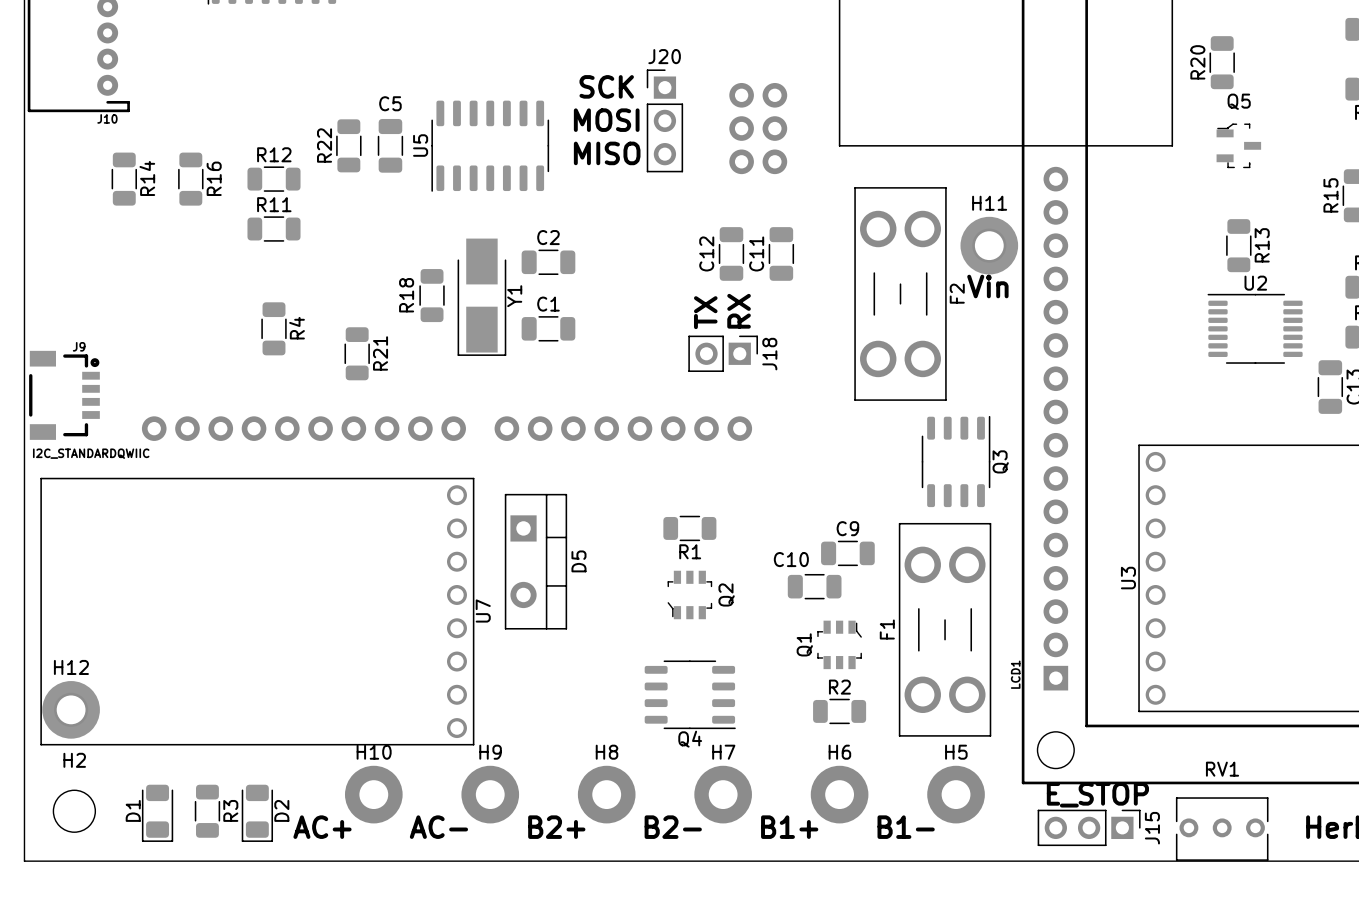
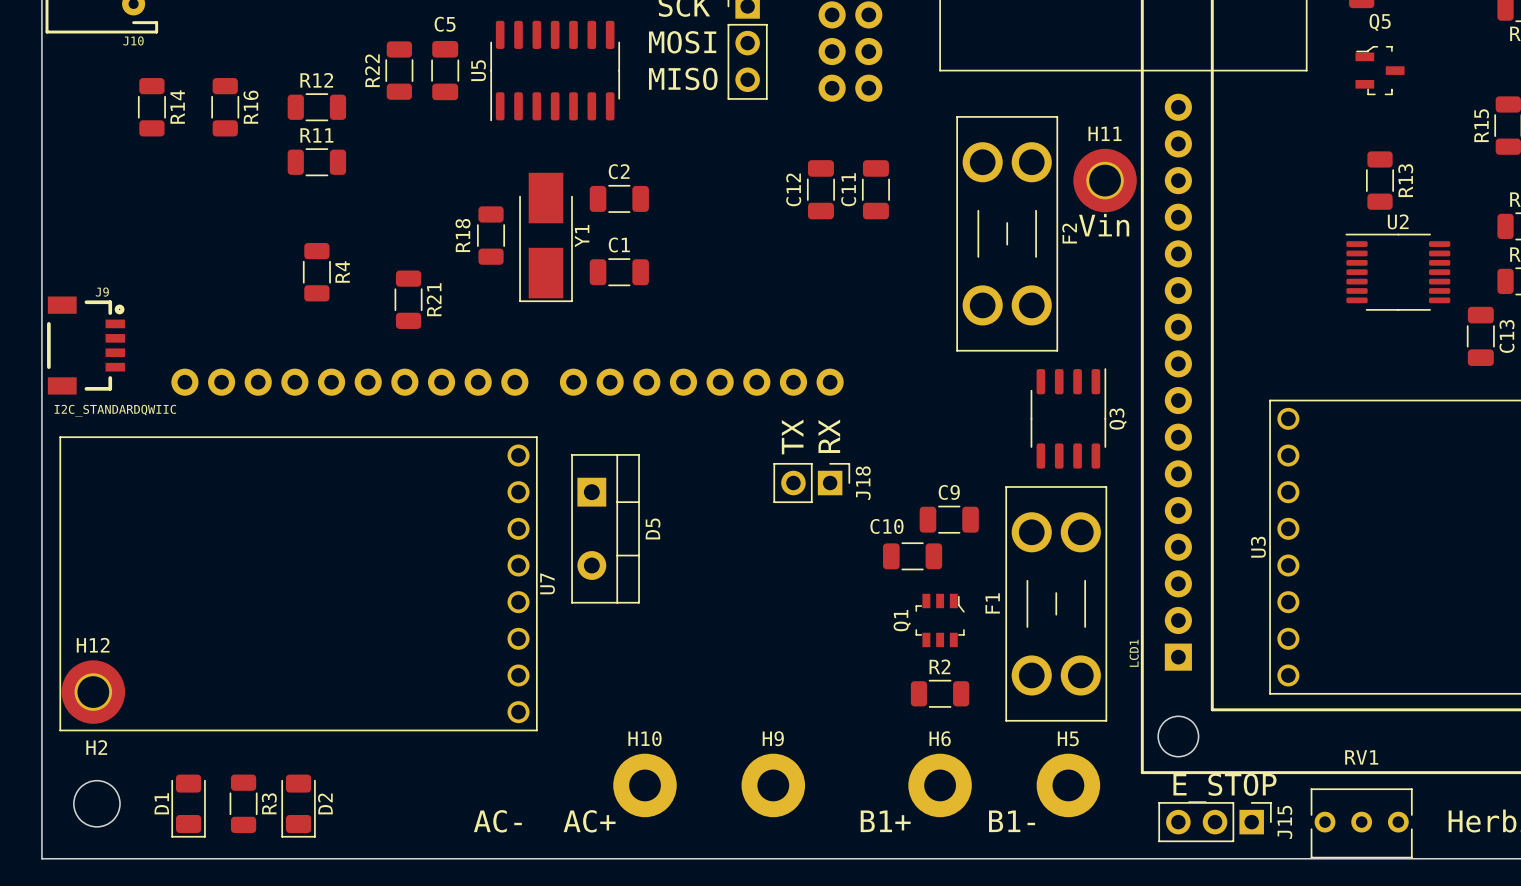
text position: RX (739, 311) -> RX (829, 436)
text position: TX (705, 312) -> TX (792, 436)
J18 position: (723, 353) -> (811, 483)
R1: (689, 528) -> none
Q2: (689, 594) -> none
Q4: (690, 694) -> none
H10 position: (373, 794) -> (644, 785)
H9 position: (490, 794) -> (773, 785)
H8: (606, 794) -> none
H7: (723, 794) -> none
text position: AC+ (322, 827) -> AC+ (589, 821)
text: B2+ (556, 827) -> none
text: B2- (673, 827) -> none

